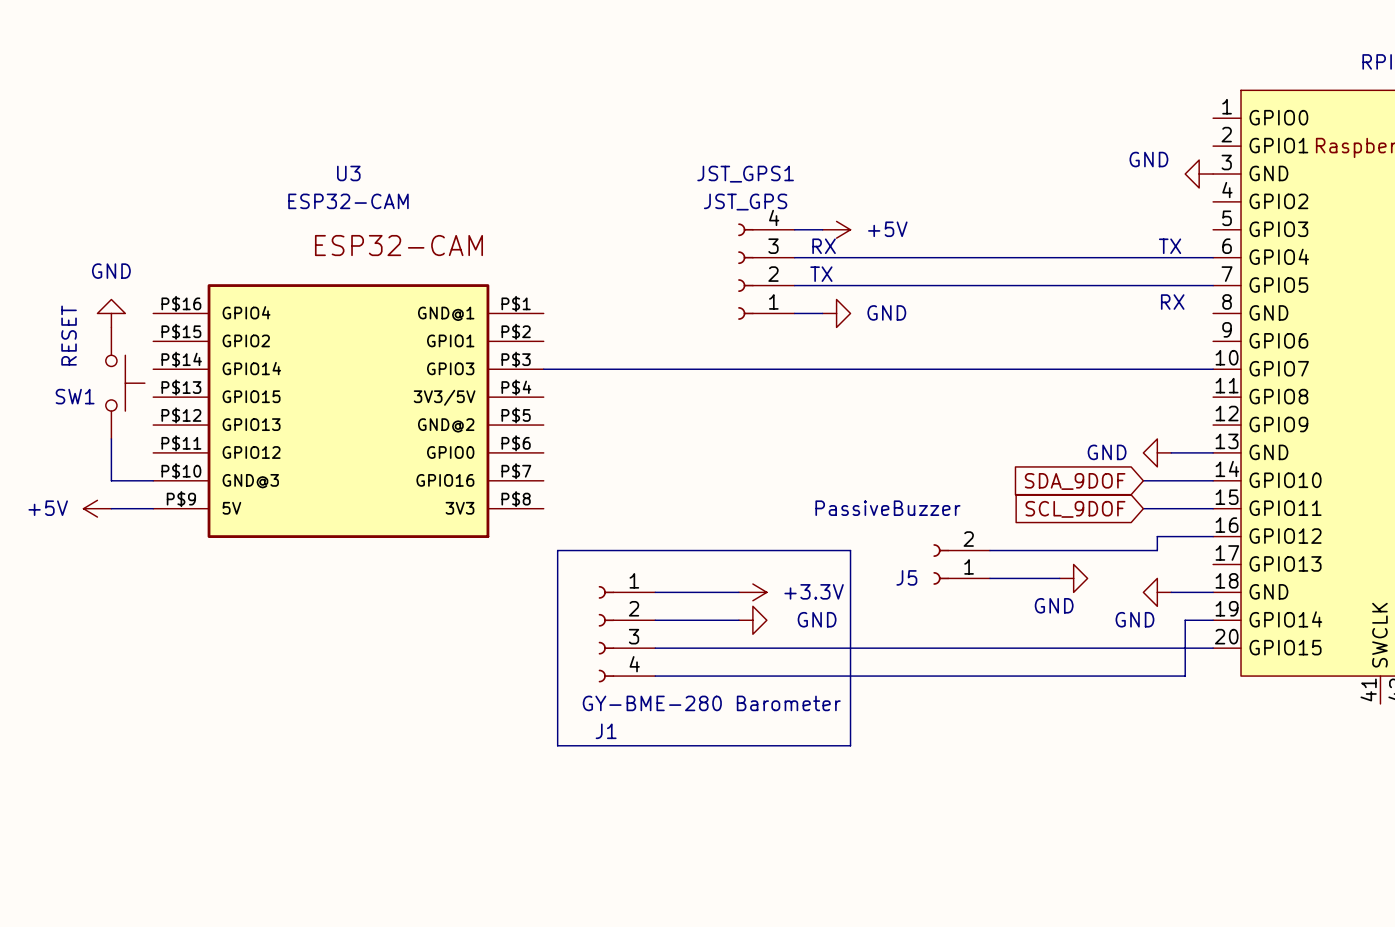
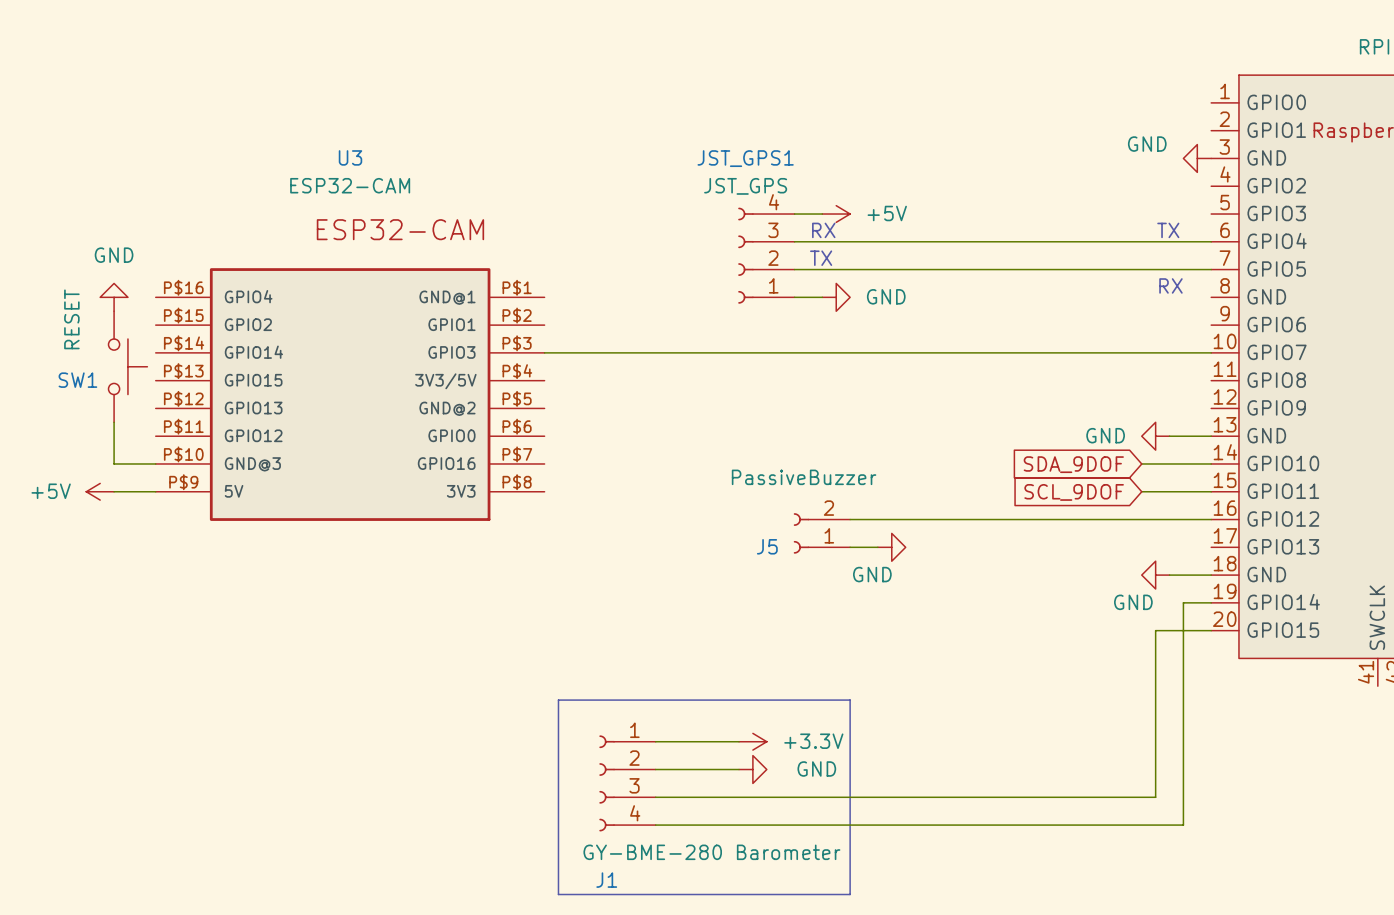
J5 value position: PassiveBuzzer (887, 508) -> PassiveBuzzer (804, 477)
wire: (1157, 536) (1157, 550) (989, 550) -> (1155, 519) (850, 519)
wire: none -> (850, 547) (877, 547)
power symbol: none -> GND (891, 547)
J5 position: (961, 564) -> (821, 533)
wire: (989, 578) (1059, 578) -> none
power symbol: GND (1073, 578) -> none
wire: (655, 592) (738, 592) -> (655, 741) (739, 741)
power symbol position: +3.3V (752, 592) -> +3.3V (752, 741)
wire: (655, 620) (738, 620) -> (655, 769) (739, 769)
power symbol: GND (752, 620) -> none
J1 position: (626, 634) -> (627, 783)
wire: (655, 648) (1157, 648) -> (655, 797) (1155, 797) (1155, 630)
wire: (655, 676) (1185, 676) -> (655, 825) (1183, 825) (1183, 658)
line: (557, 717) (557, 550) (850, 550) (850, 717) -> (558, 700) (850, 700)
line: (557, 745) (850, 745) -> (558, 727) (558, 894) (850, 894) (850, 727)
power symbol: none -> GND (752, 769)

